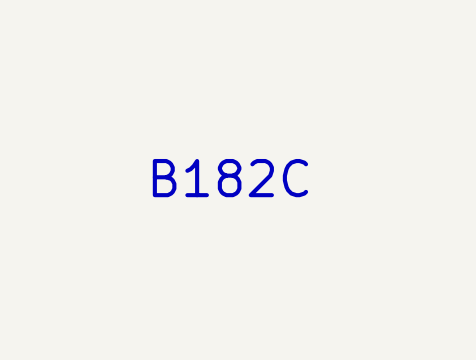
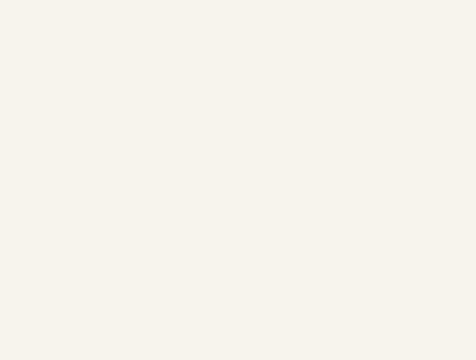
text: B182C (230, 178) -> none

